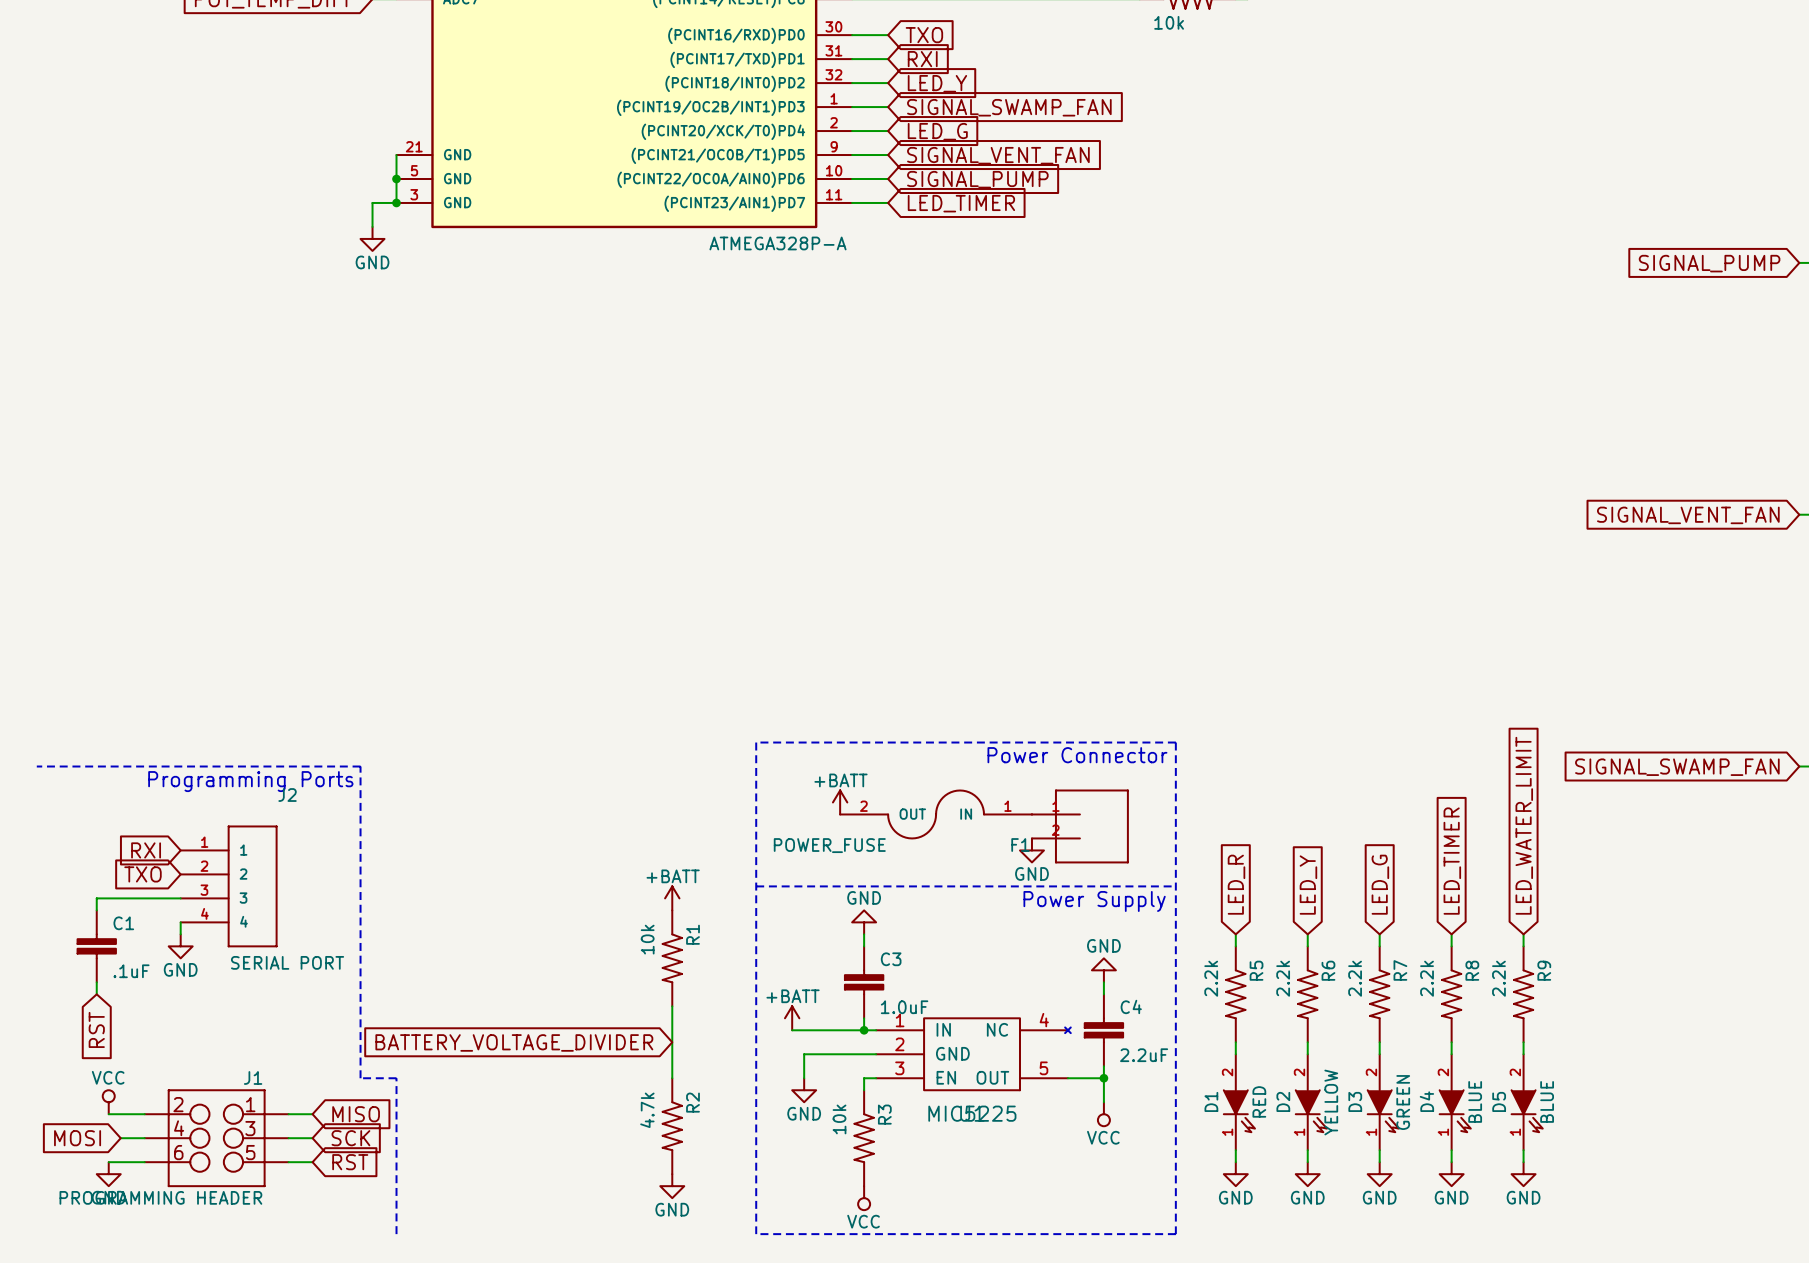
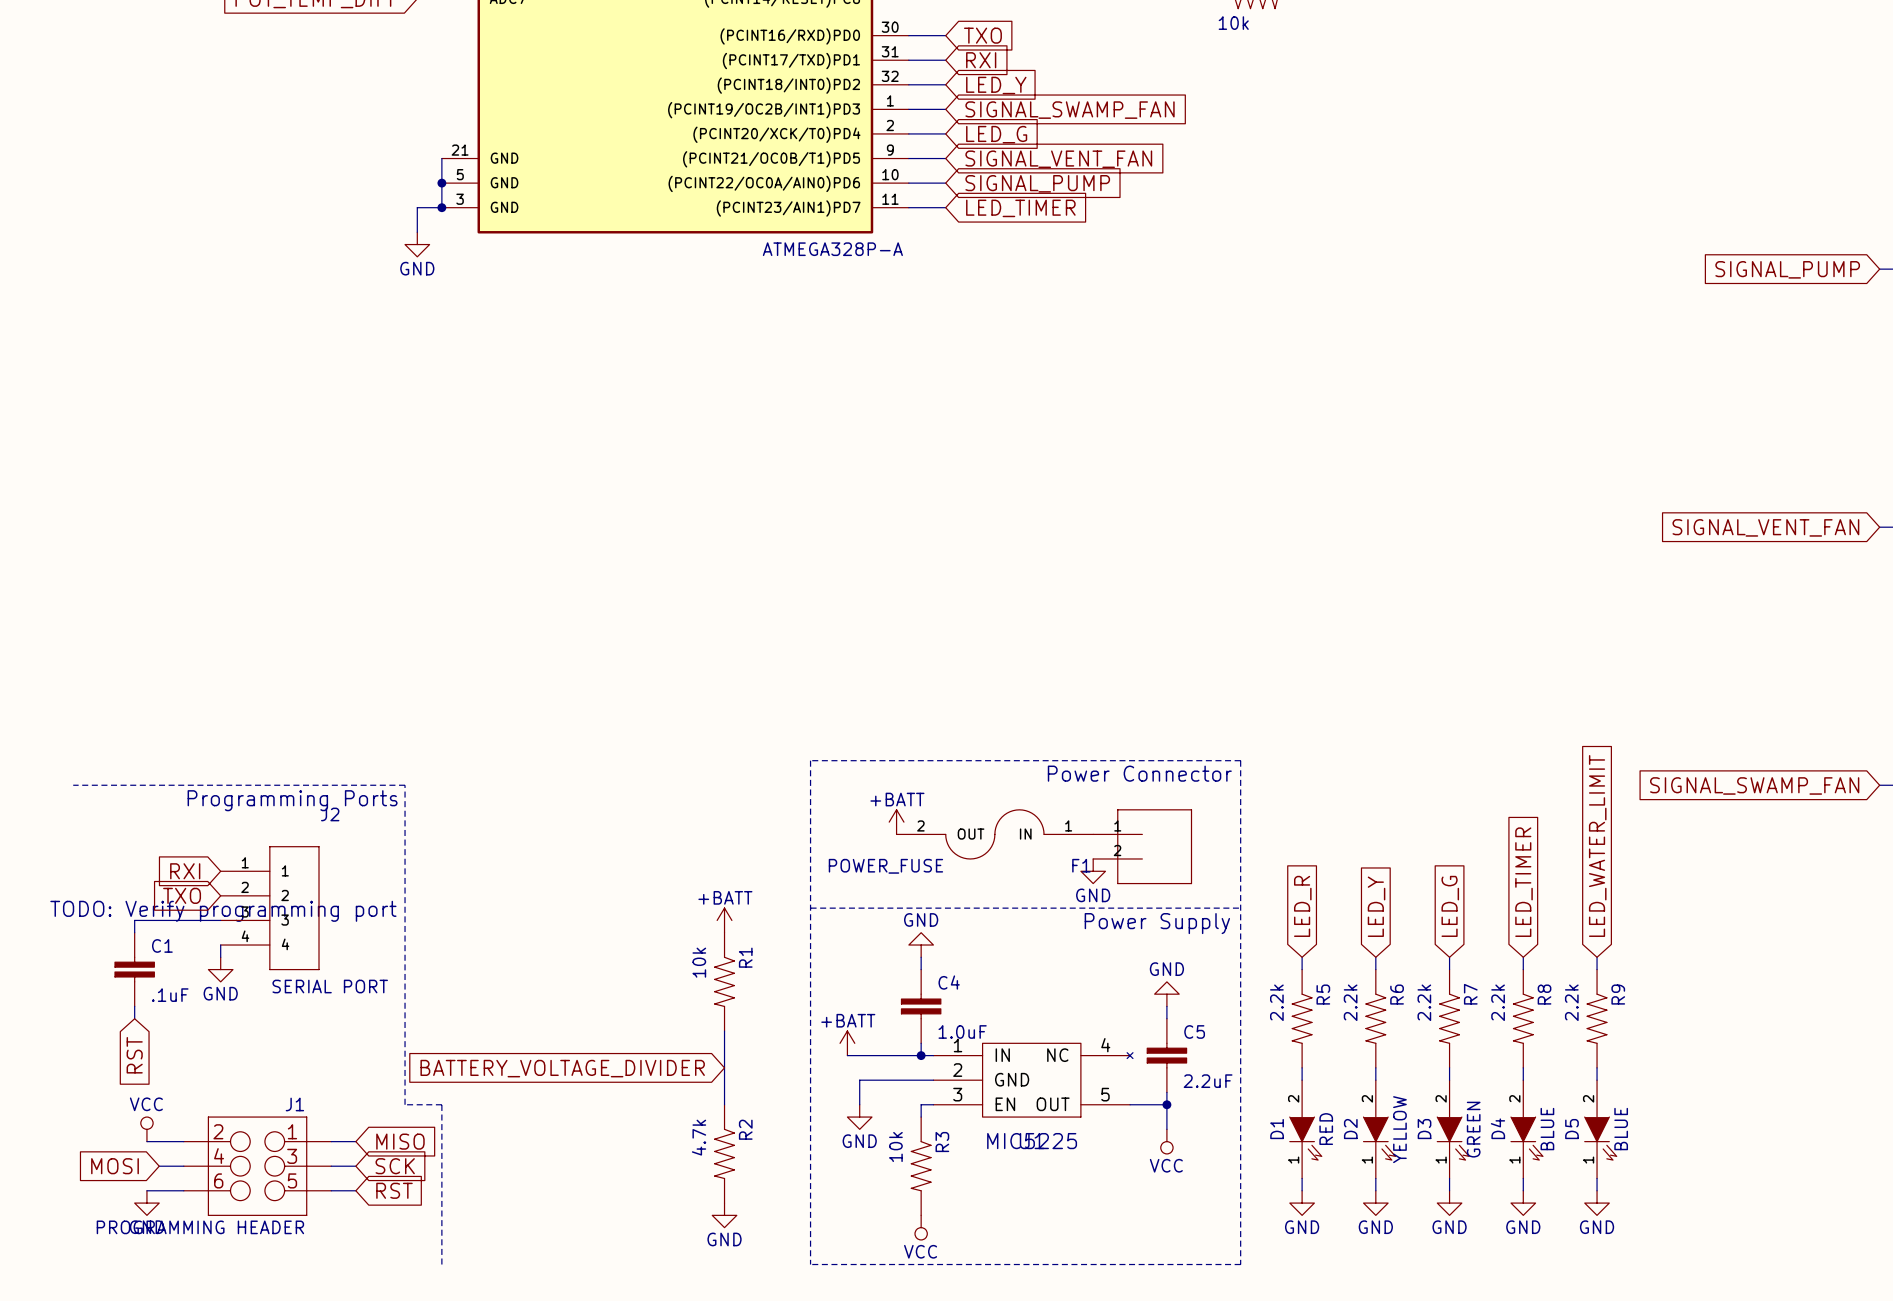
text: none -> TODO: Verify programming port (223, 911)
C3 name: C3 (891, 959) -> C4 (949, 982)
C4 name: C4 (1131, 1006) -> C5 (1194, 1031)

